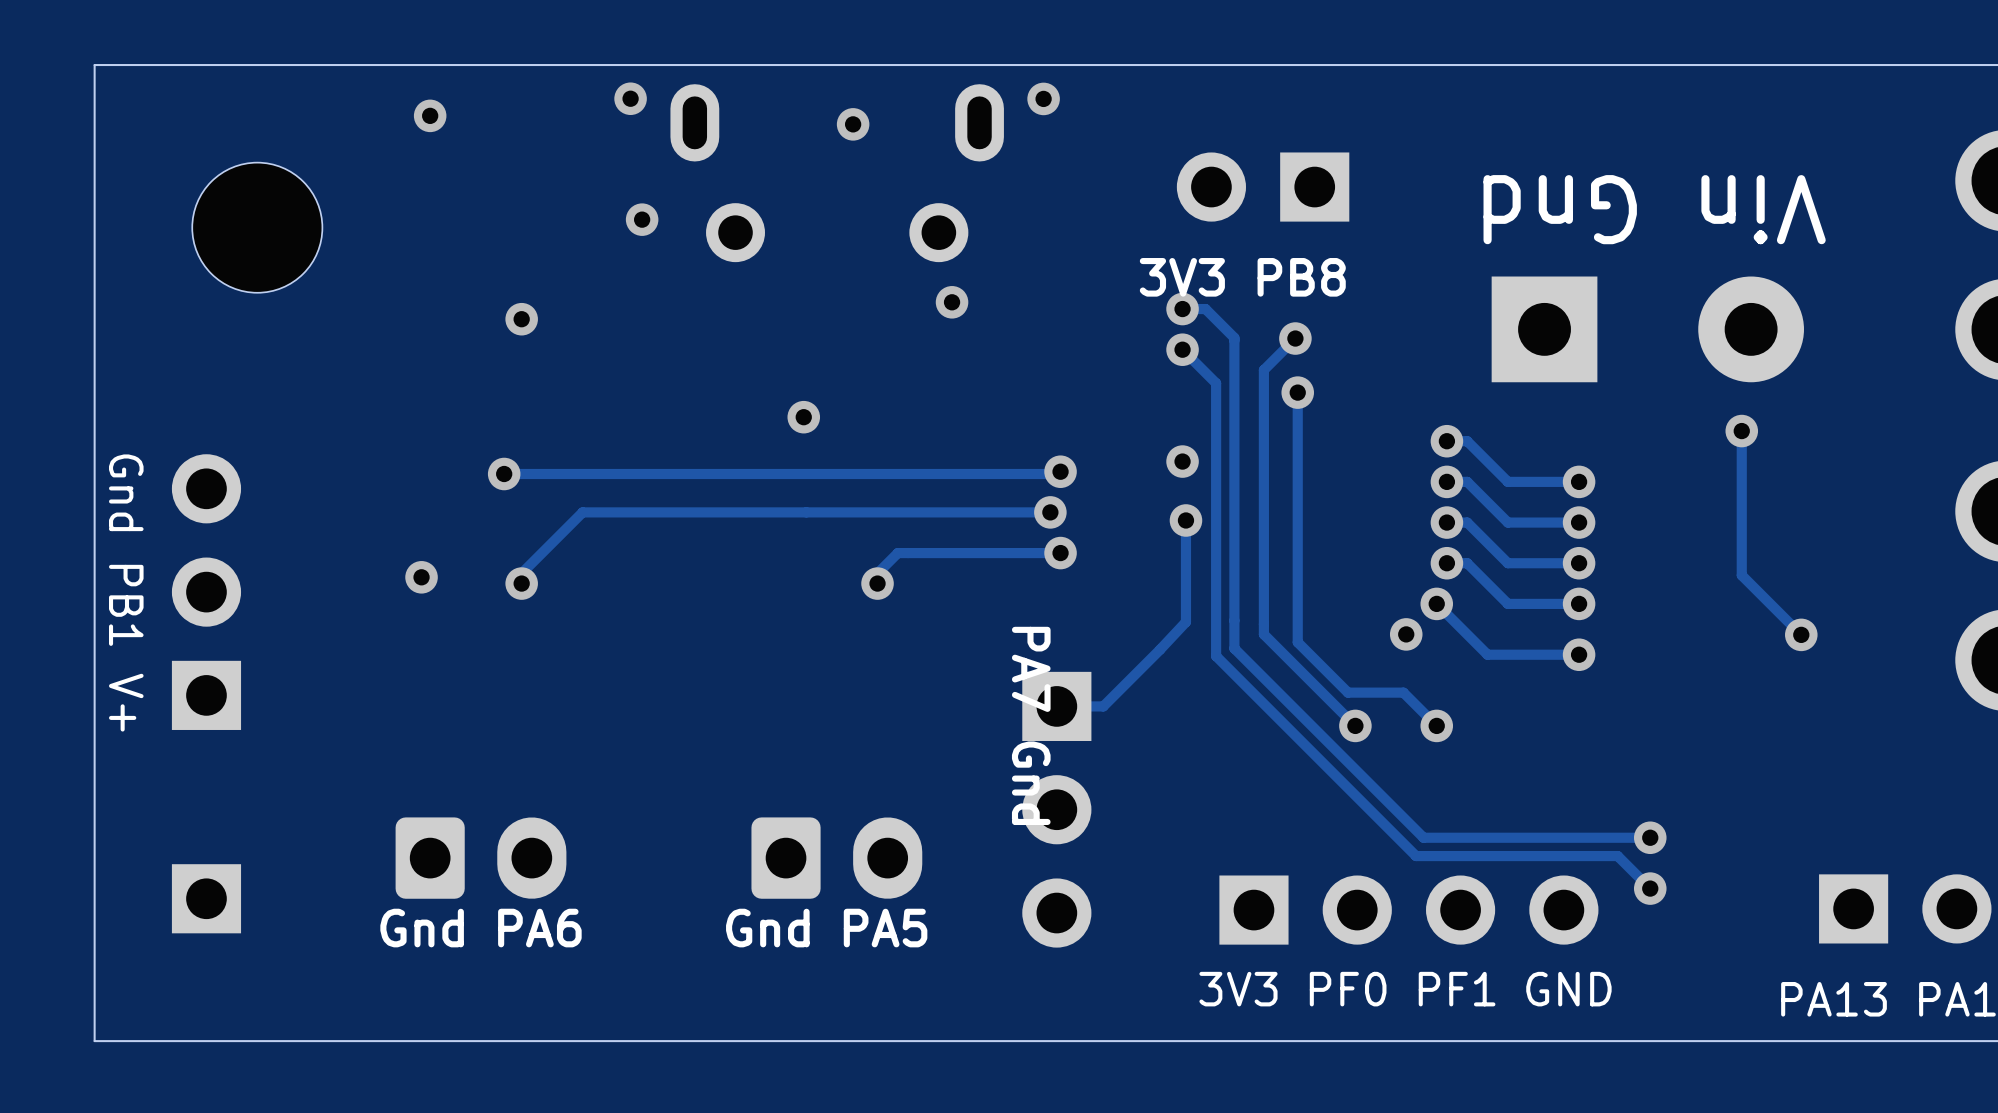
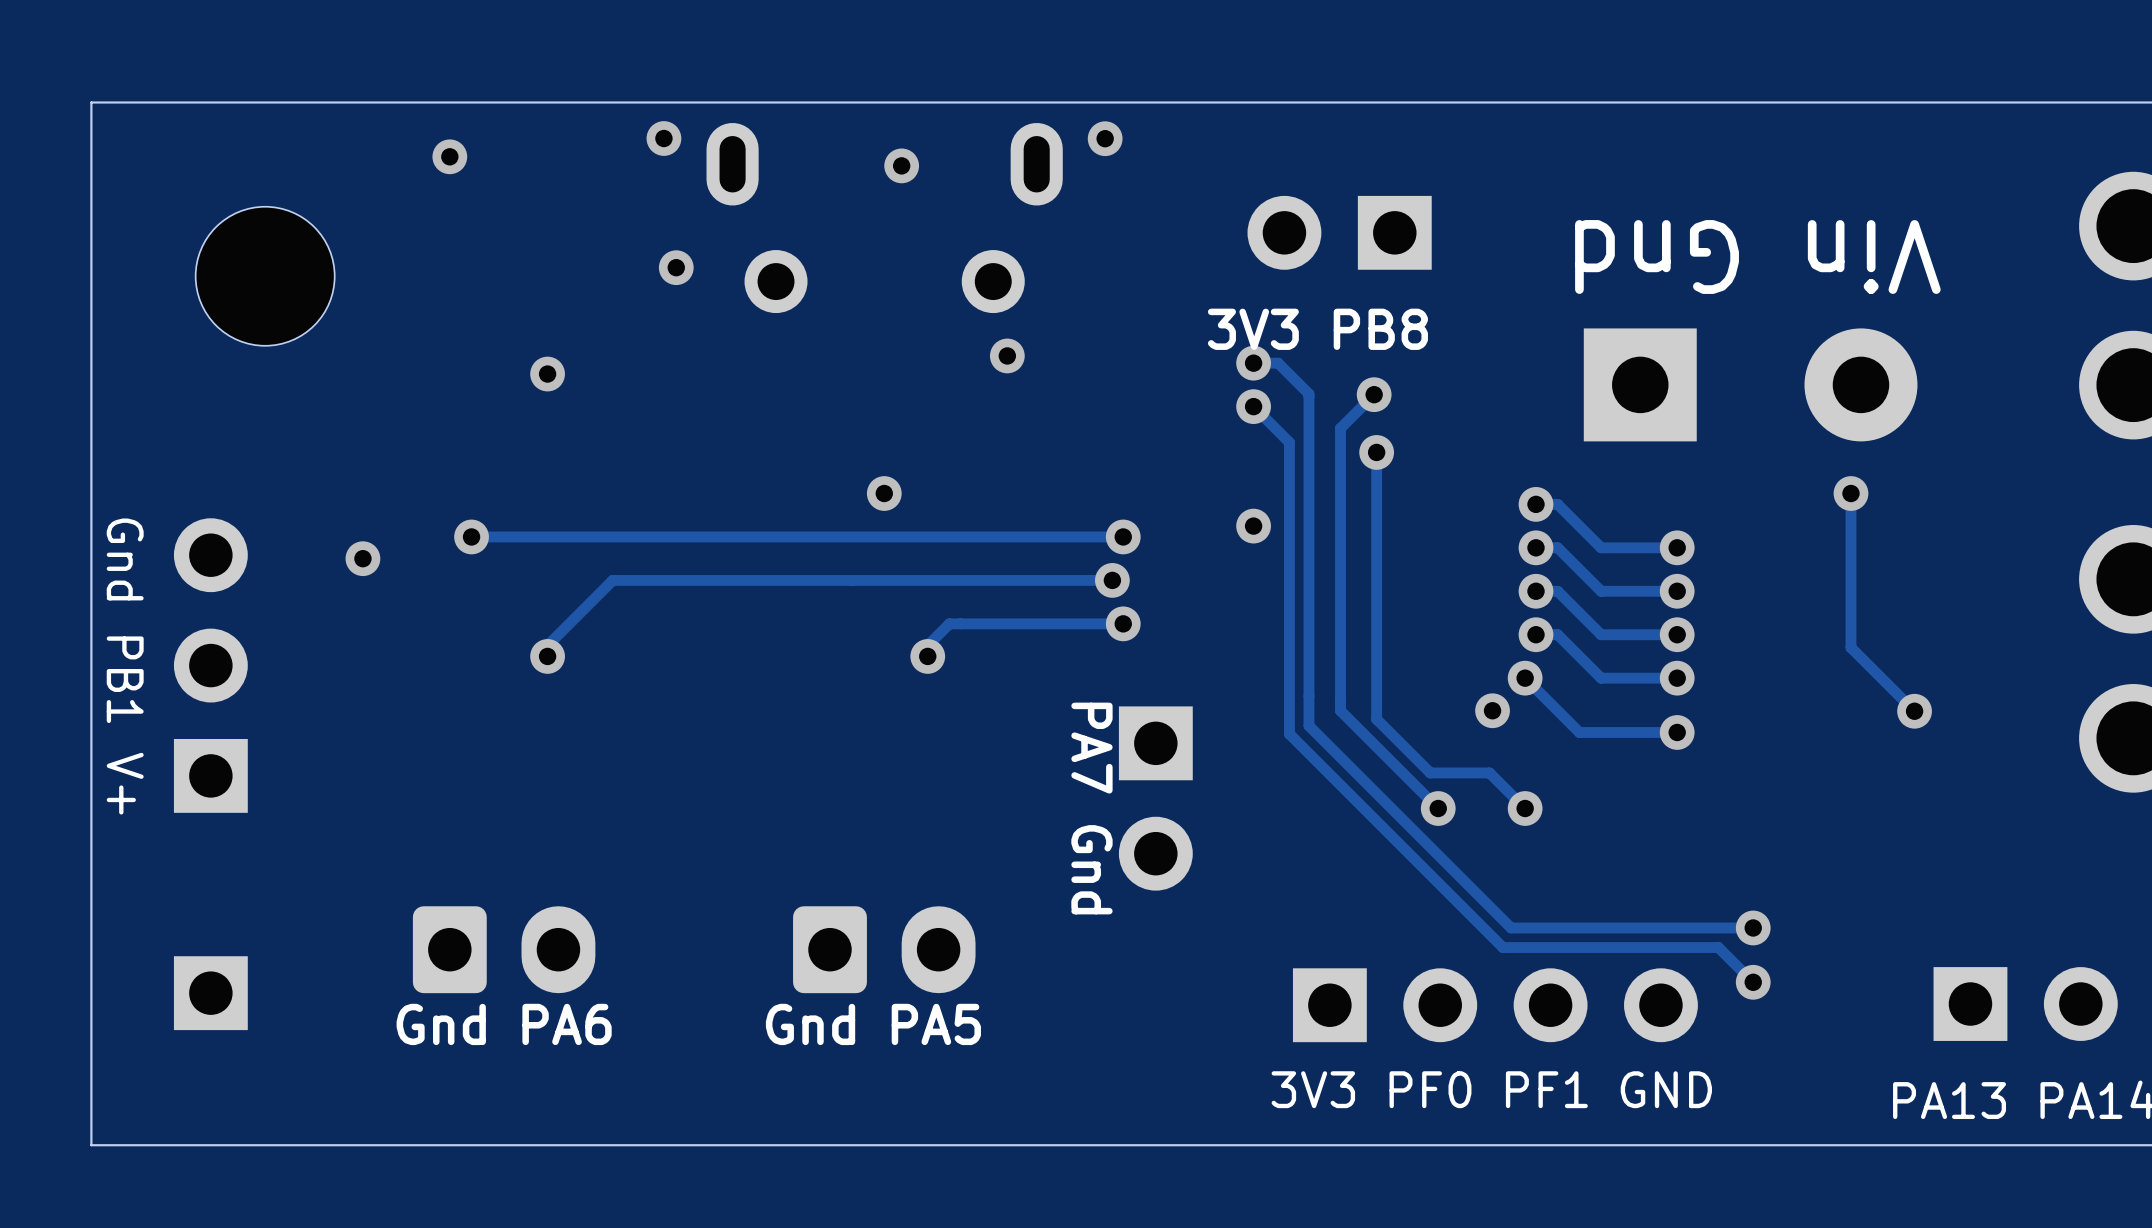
via position: (803, 417) -> (884, 493)
track: (1060, 471) (1058, 474) (504, 474) -> (1123, 536) (471, 536)
via position: (504, 474) -> (471, 536)
via: none -> (362, 558)
track: (1185, 520) (1185, 622) (1103, 706) (1056, 706) -> none
via: (1185, 520) -> none
via: (421, 577) -> none
part: none -> (1155, 798)
part: (1056, 809) -> none

